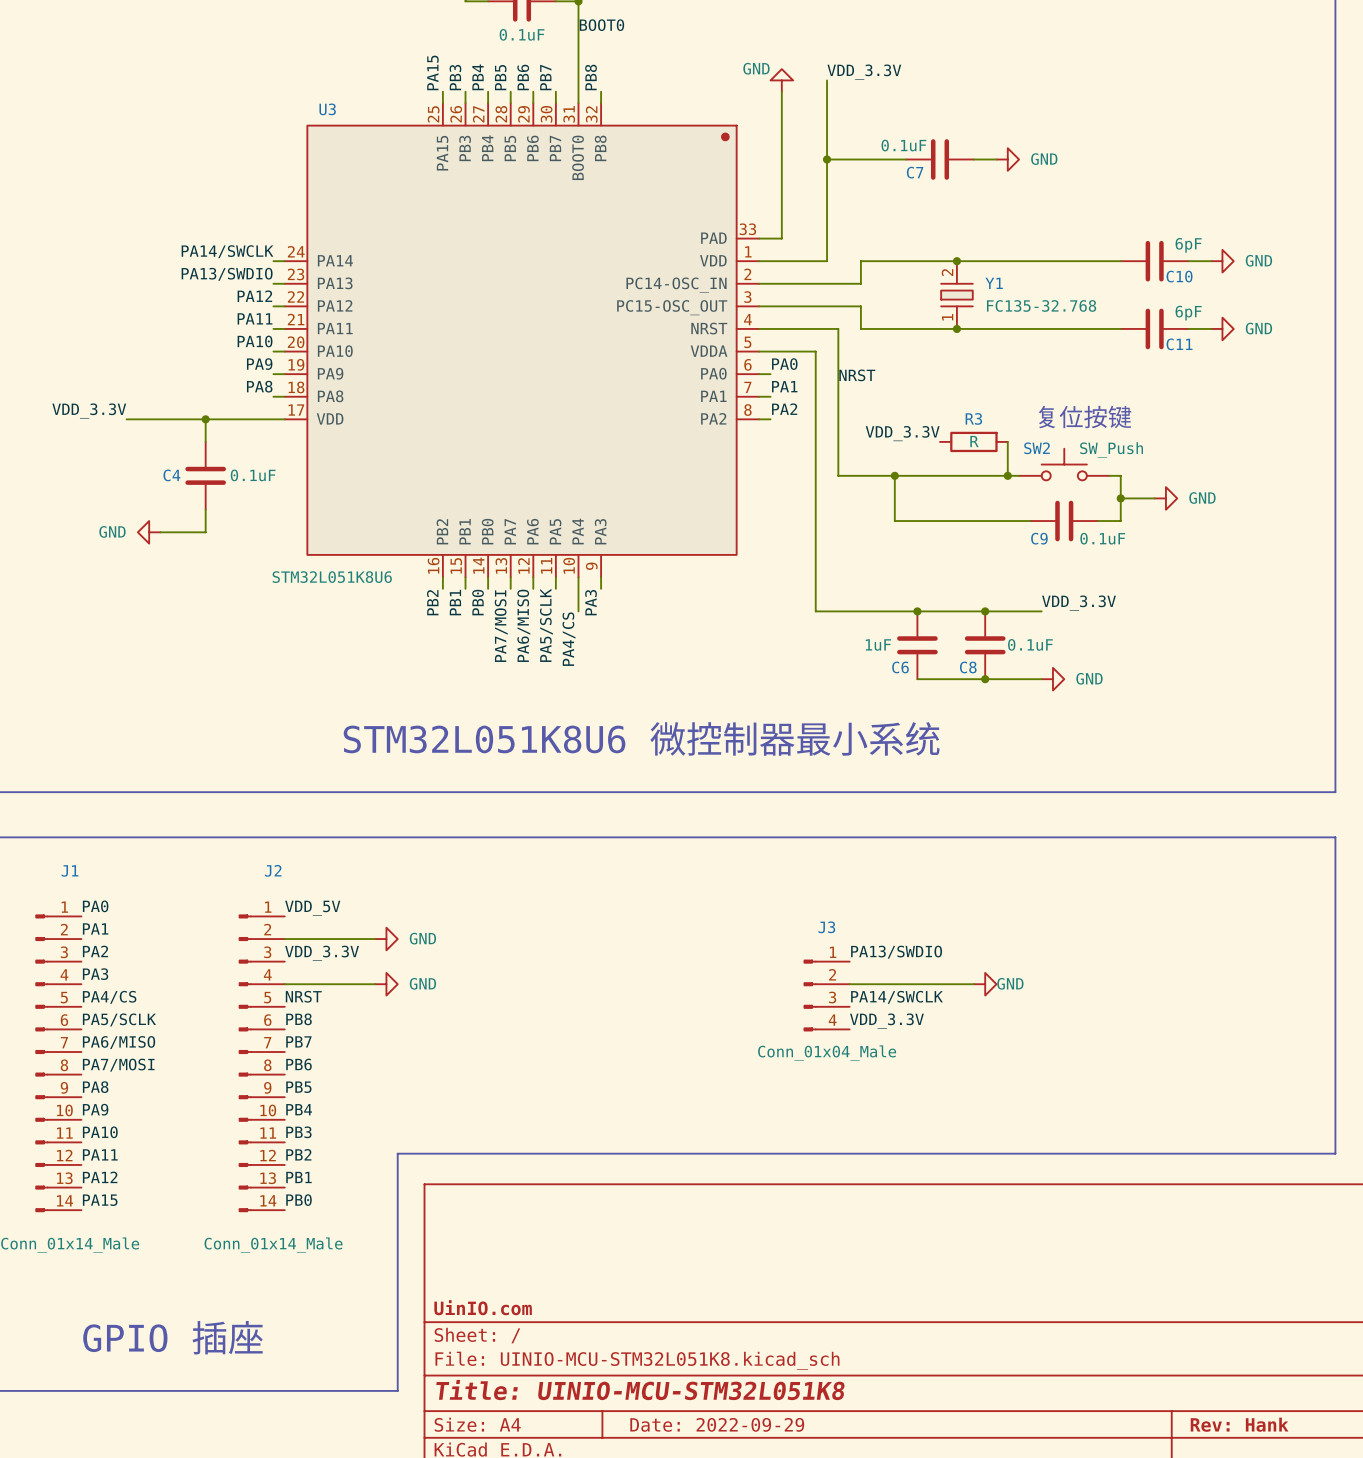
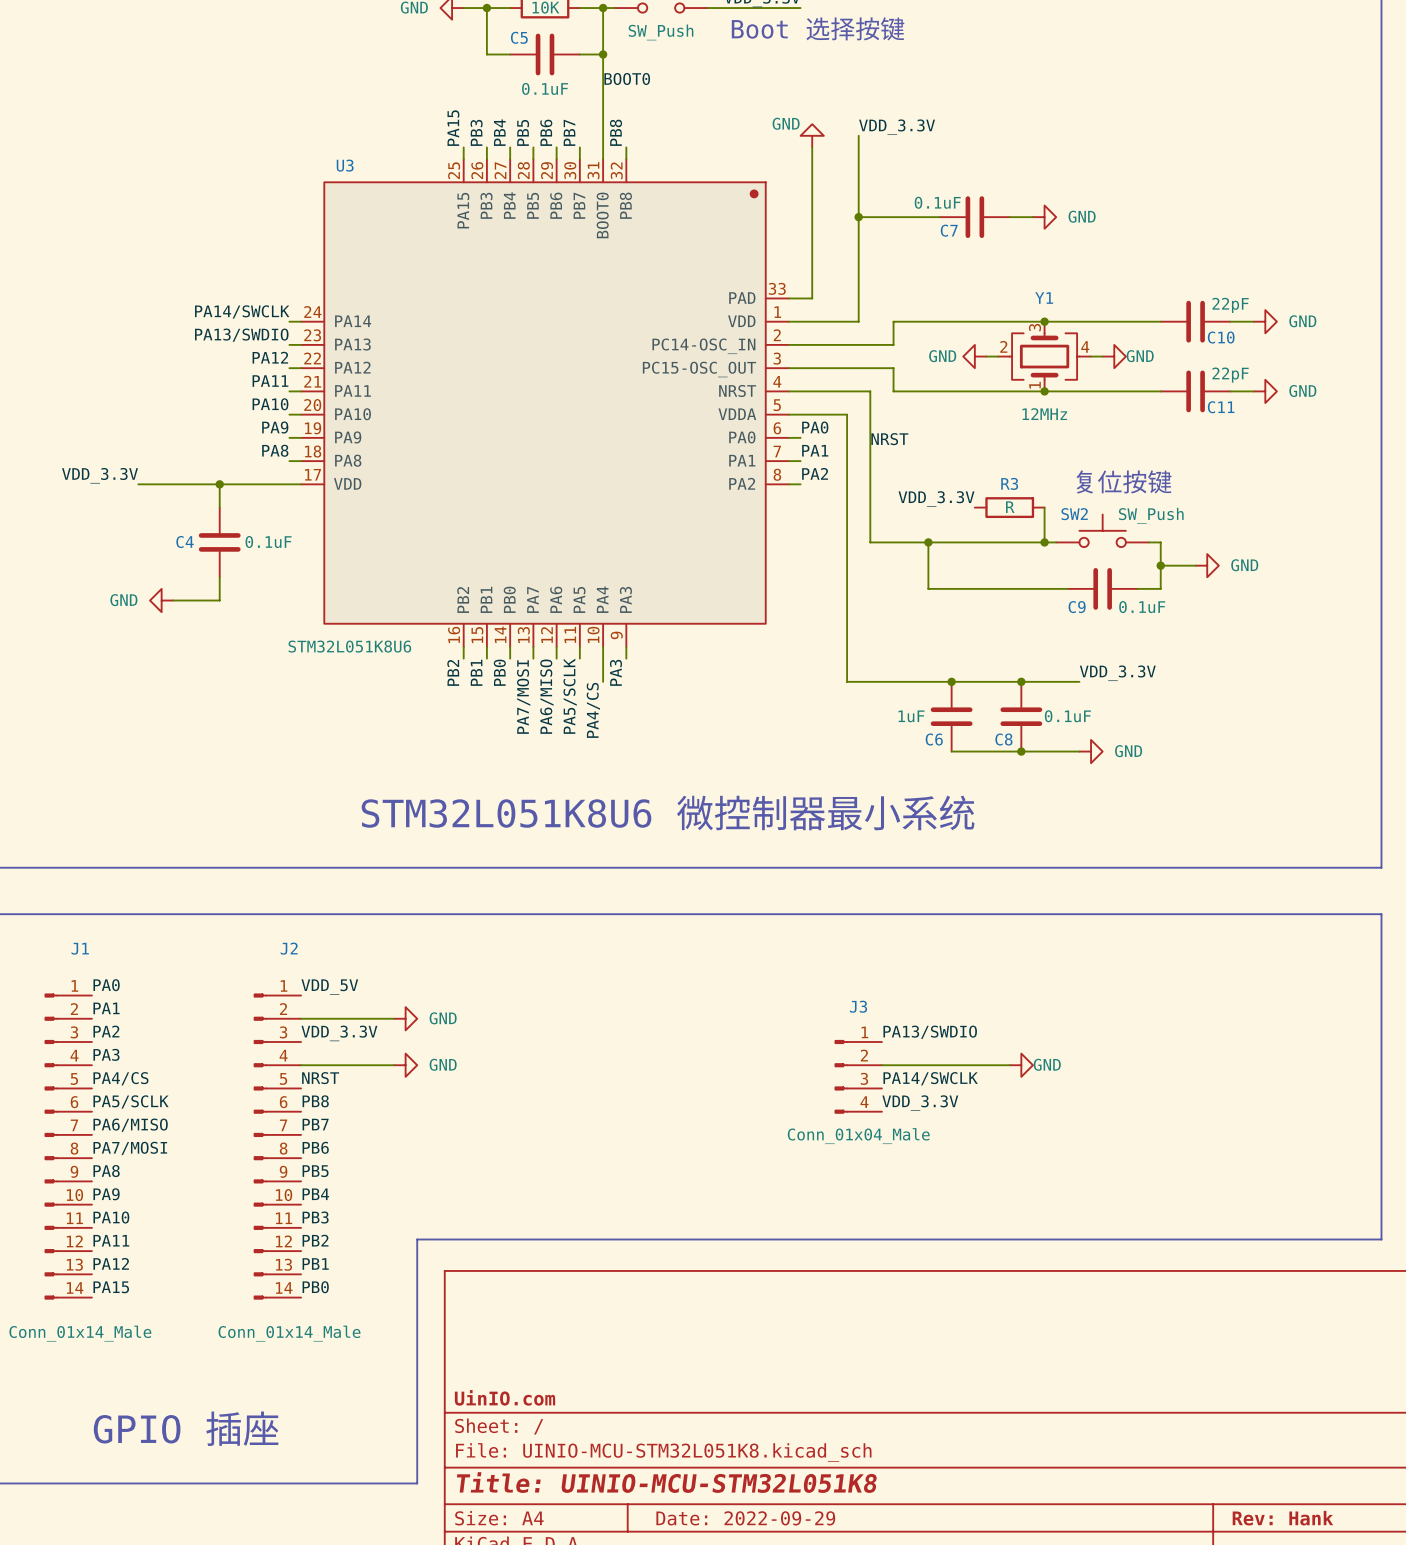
C10 value: 6pF (1188, 245) -> 22pF (1230, 305)
Y1 symbol: [940, 261, 974, 329] -> [998, 321, 1092, 392]
junction: (956, 261) -> none
junction: none -> (1044, 321)
Y1 name position: Y1 (994, 283) -> Y1 (1044, 298)
power symbol: none -> GND (974, 356)
wire: none -> (1091, 356) (1102, 356)
power symbol: none -> GND (1114, 356)
Y1 value: FC135-32.768 (1041, 305) -> 12MHz (1044, 414)
C11 value: 6pF (1188, 313) -> 22pF (1230, 375)
junction: (956, 328) -> none
junction: none -> (1044, 391)

